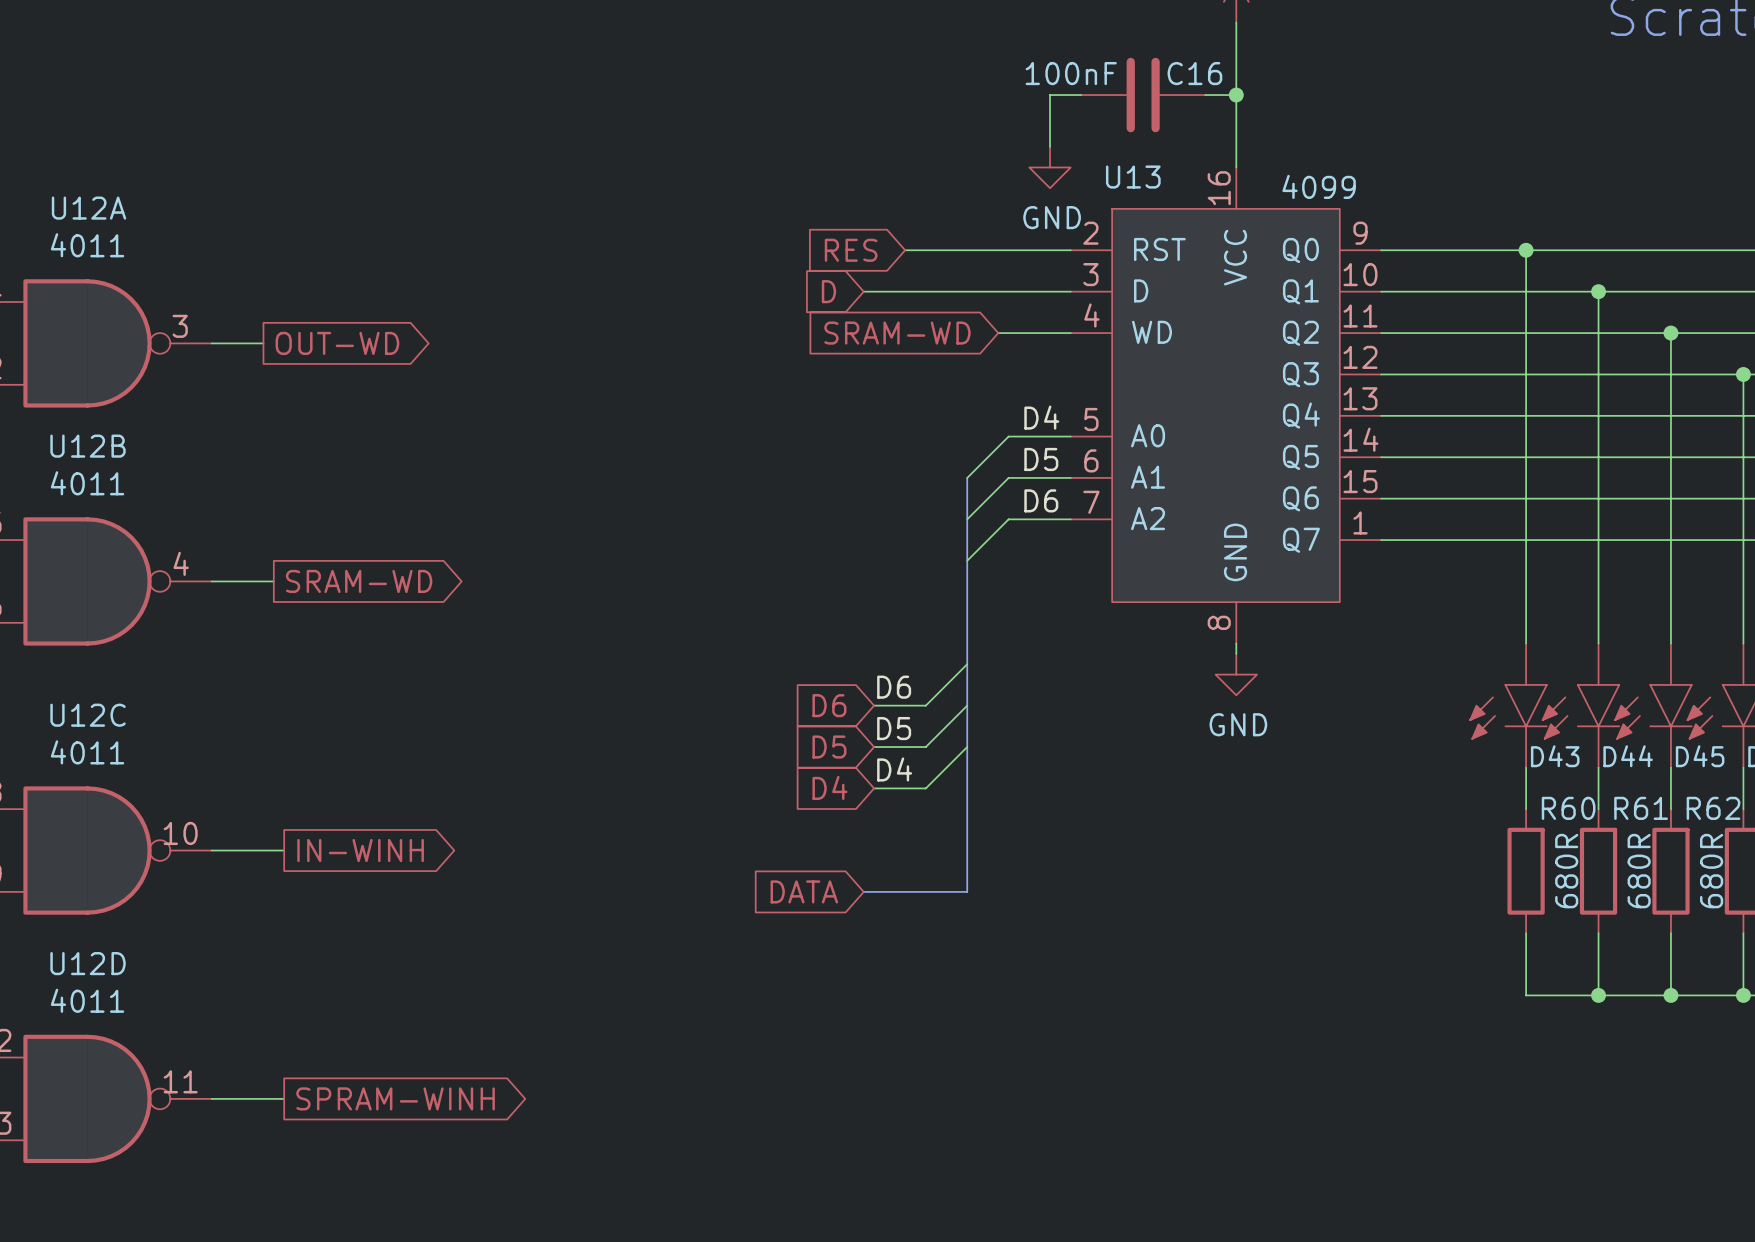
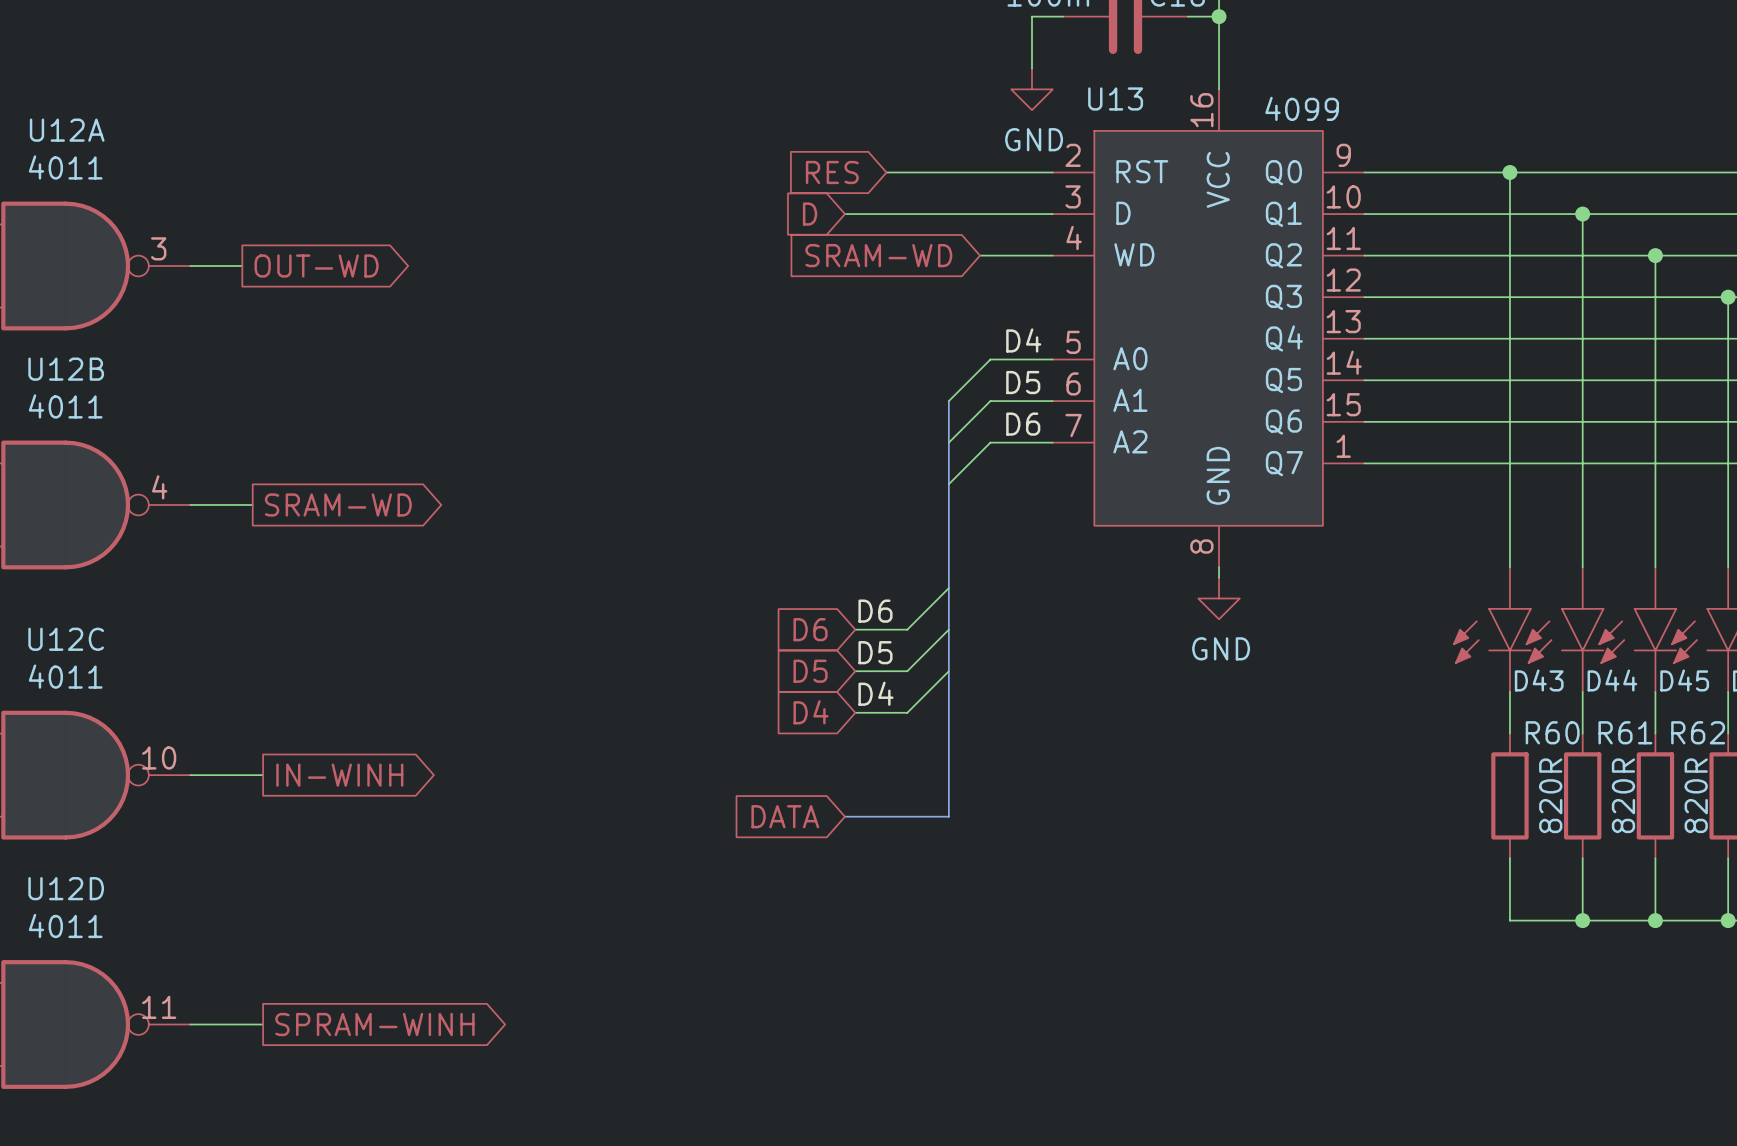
R60 value: 680R (1566, 871) -> 820R (1550, 795)
R61 value: 680R (1639, 871) -> 820R (1623, 795)
R62 value: 680R (1711, 871) -> 820R (1696, 795)

